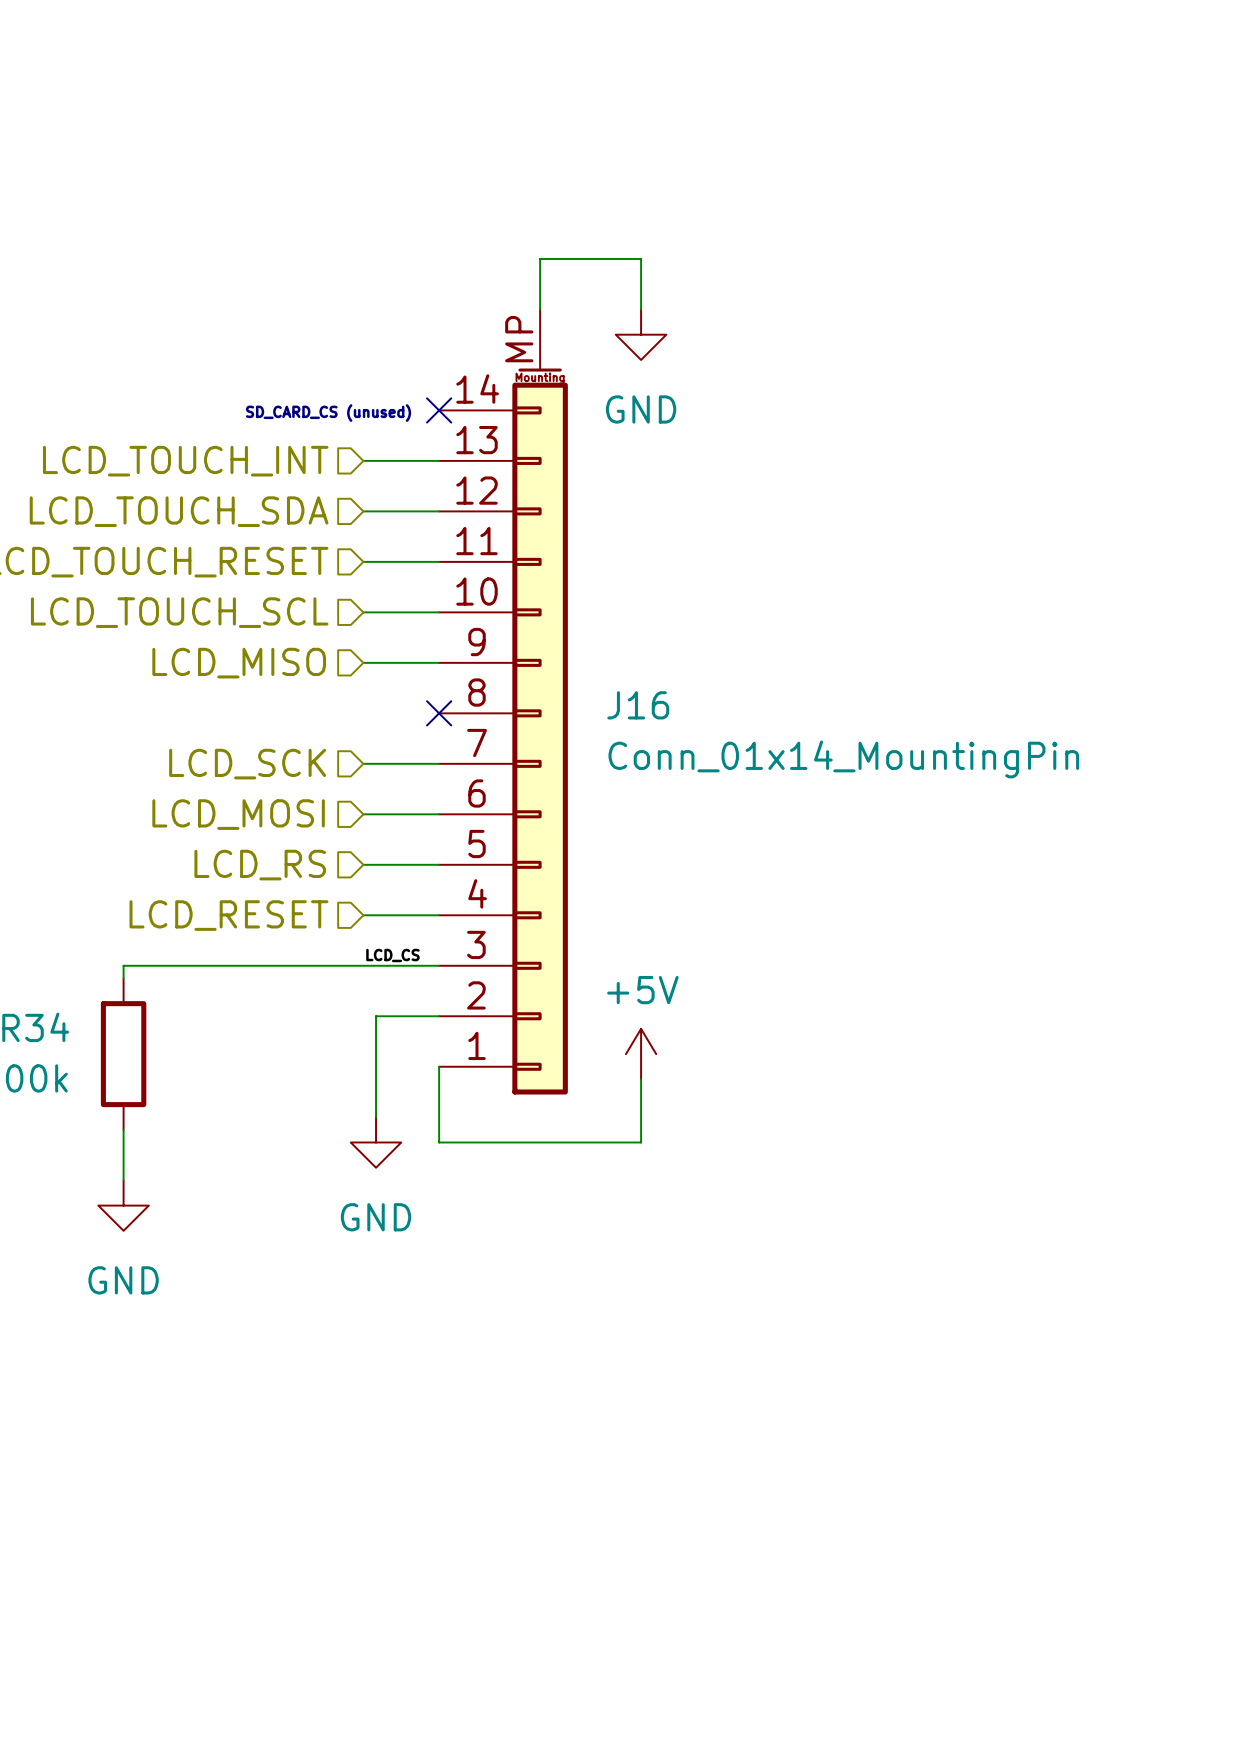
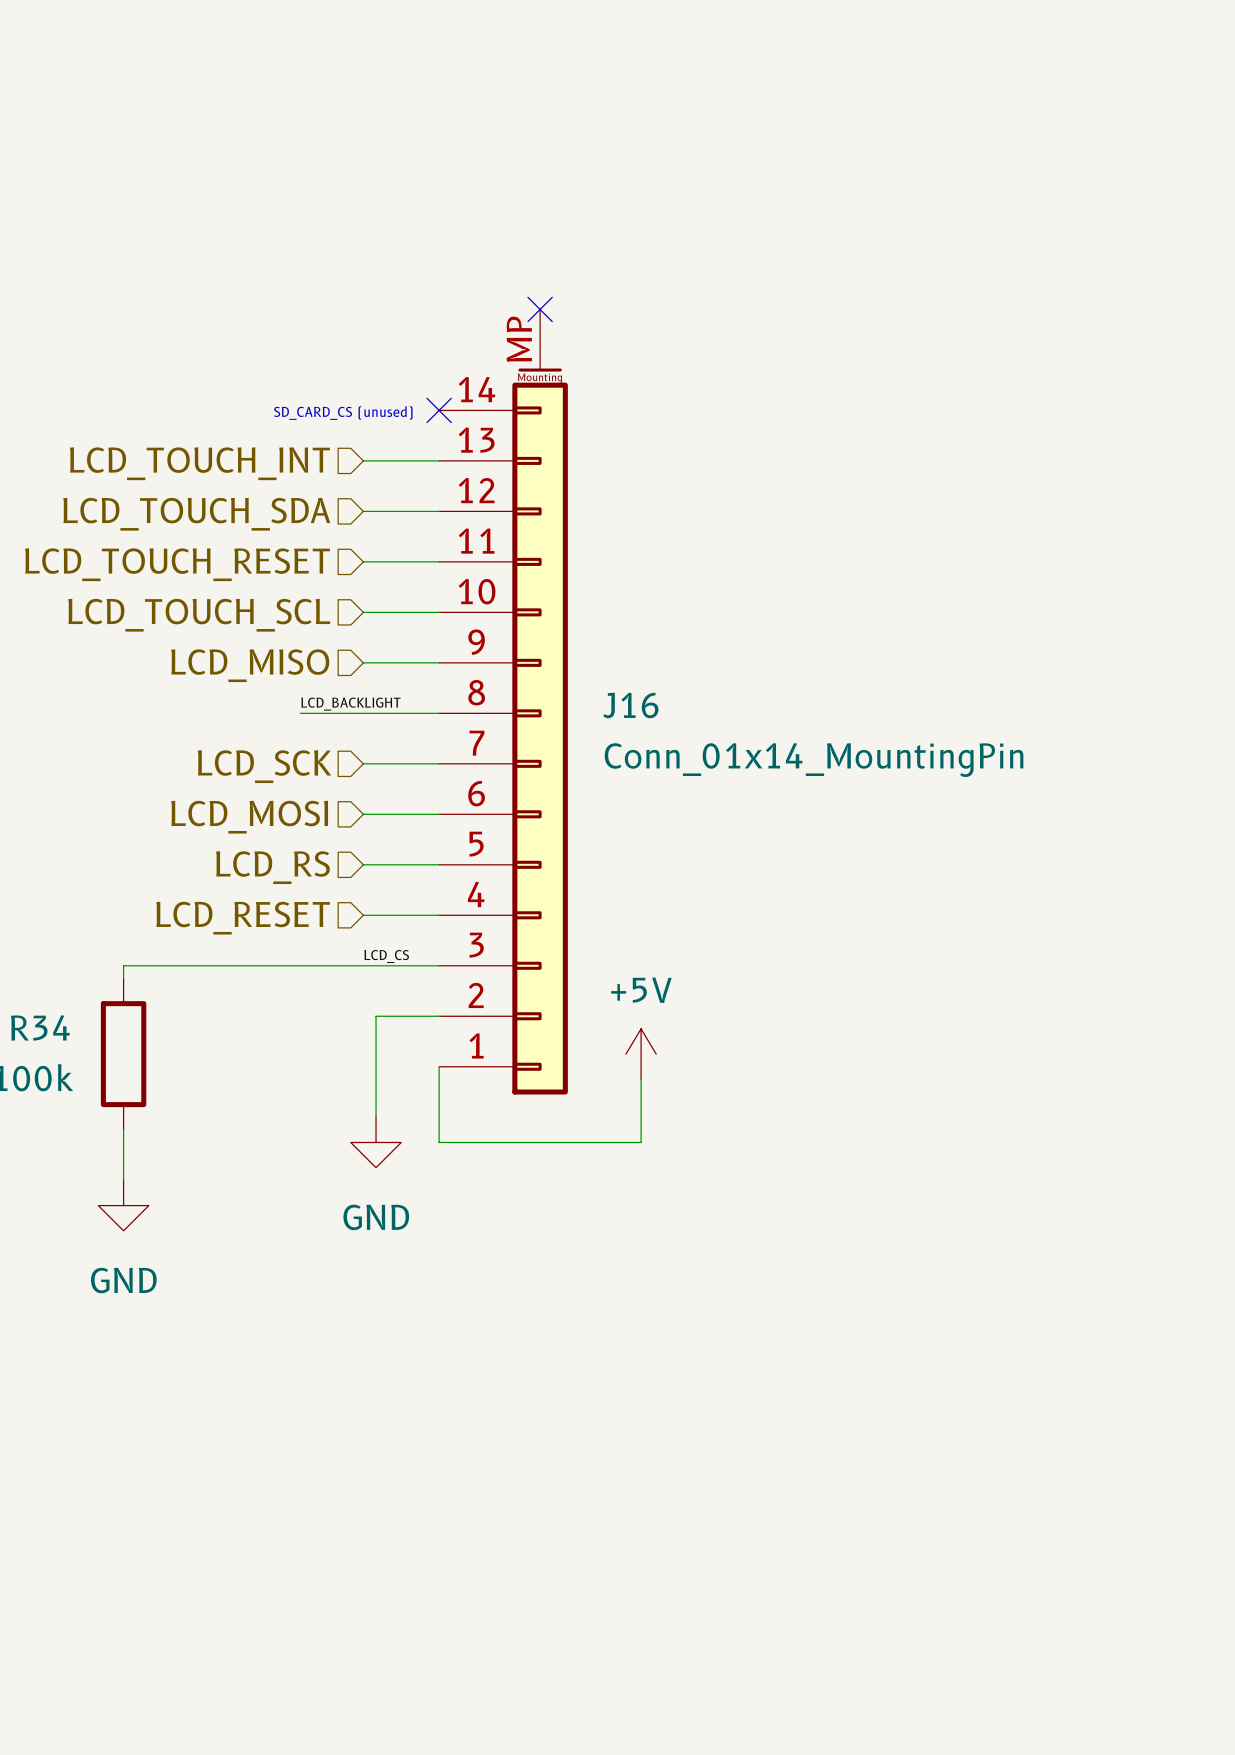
wire: (540, 309) (540, 258) (641, 258) (641, 309) -> none
no-connect mark: none -> (540, 309)
power symbol: GND (641, 334) -> none
label: none -> LCD_BACKLIGHT (350, 704)
wire: none -> (300, 713) (439, 713)
no-connect mark: (439, 713) -> none

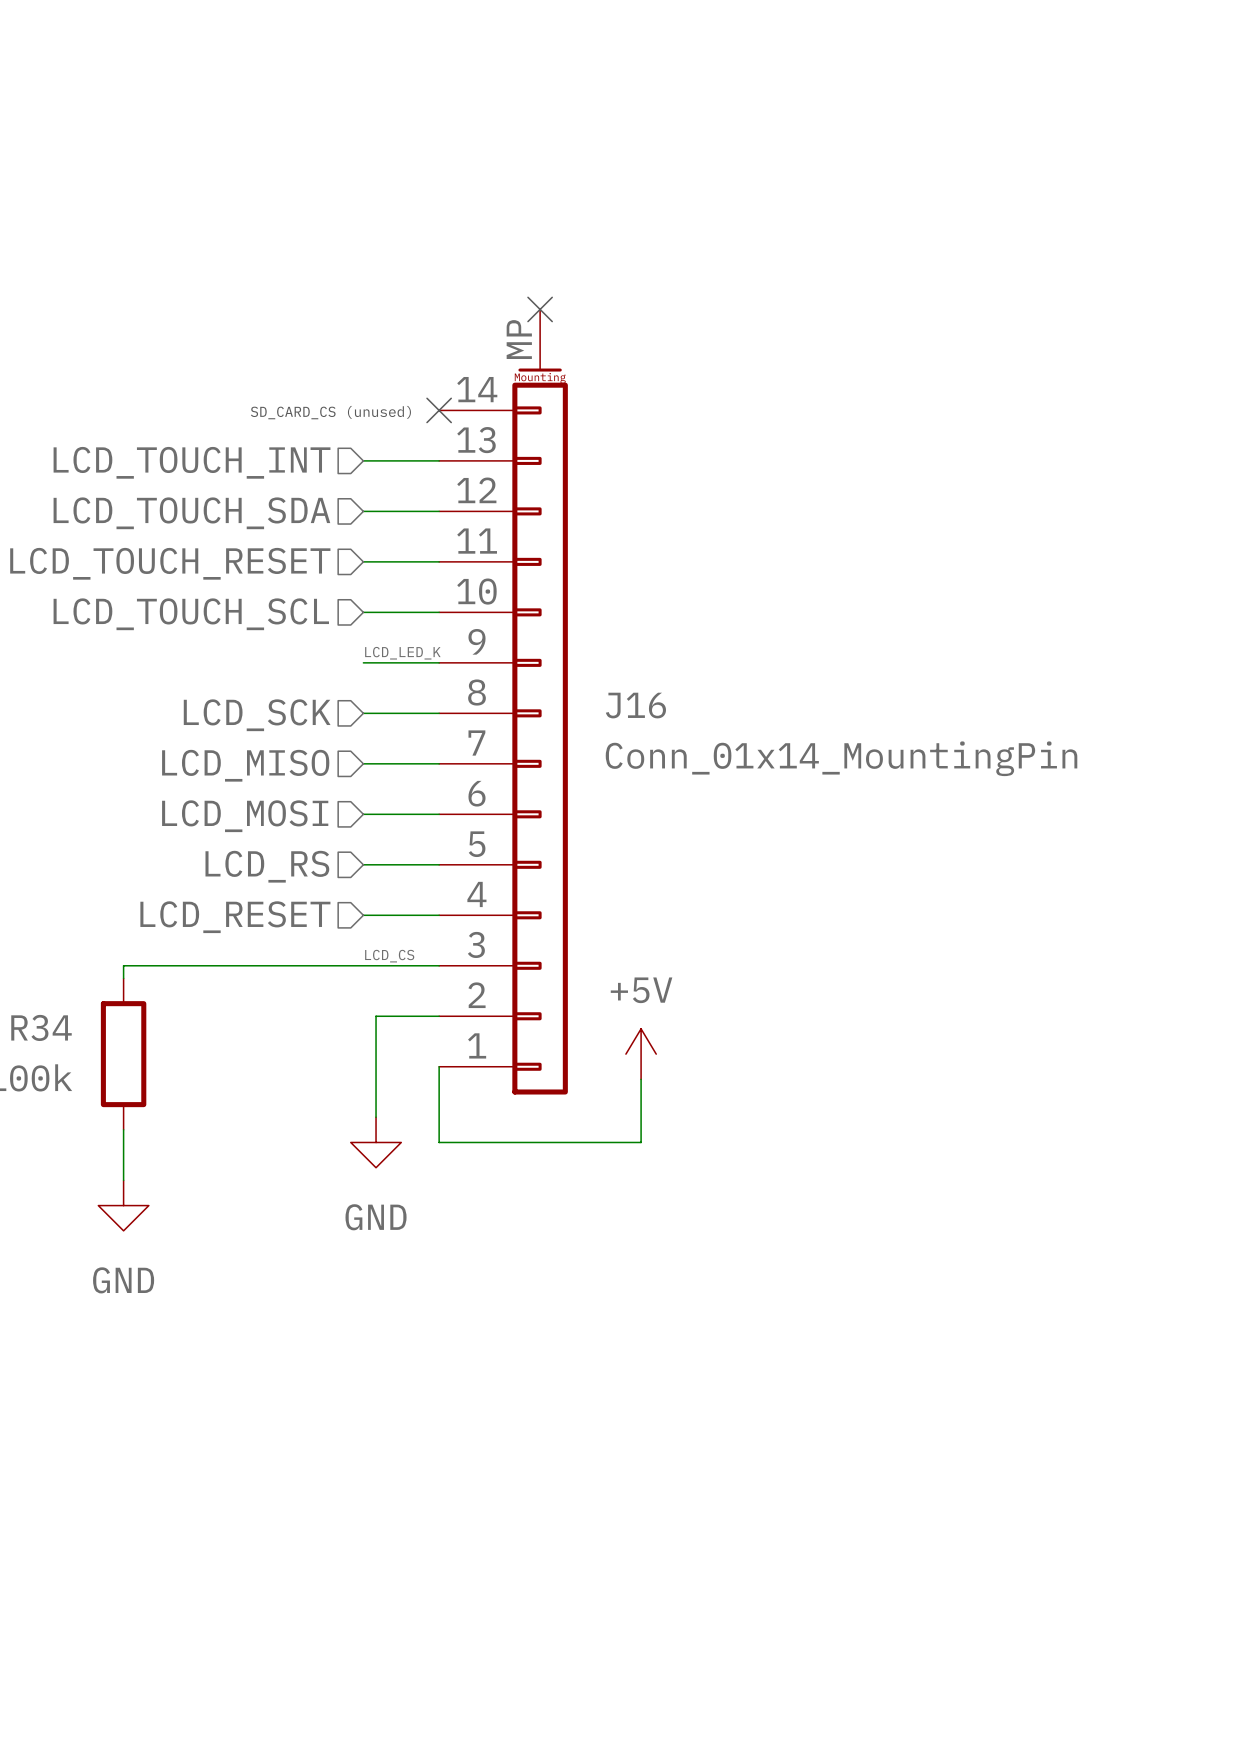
label: none -> LCD_LED_K (402, 653)
hierarchical label: LCD_MISO (250, 665) -> LCD_SCK (257, 715)
label: LCD_BACKLIGHT (350, 704) -> none
wire: (300, 713) (363, 713) -> none
hierarchical label: LCD_SCK (264, 766) -> LCD_MISO (245, 765)

